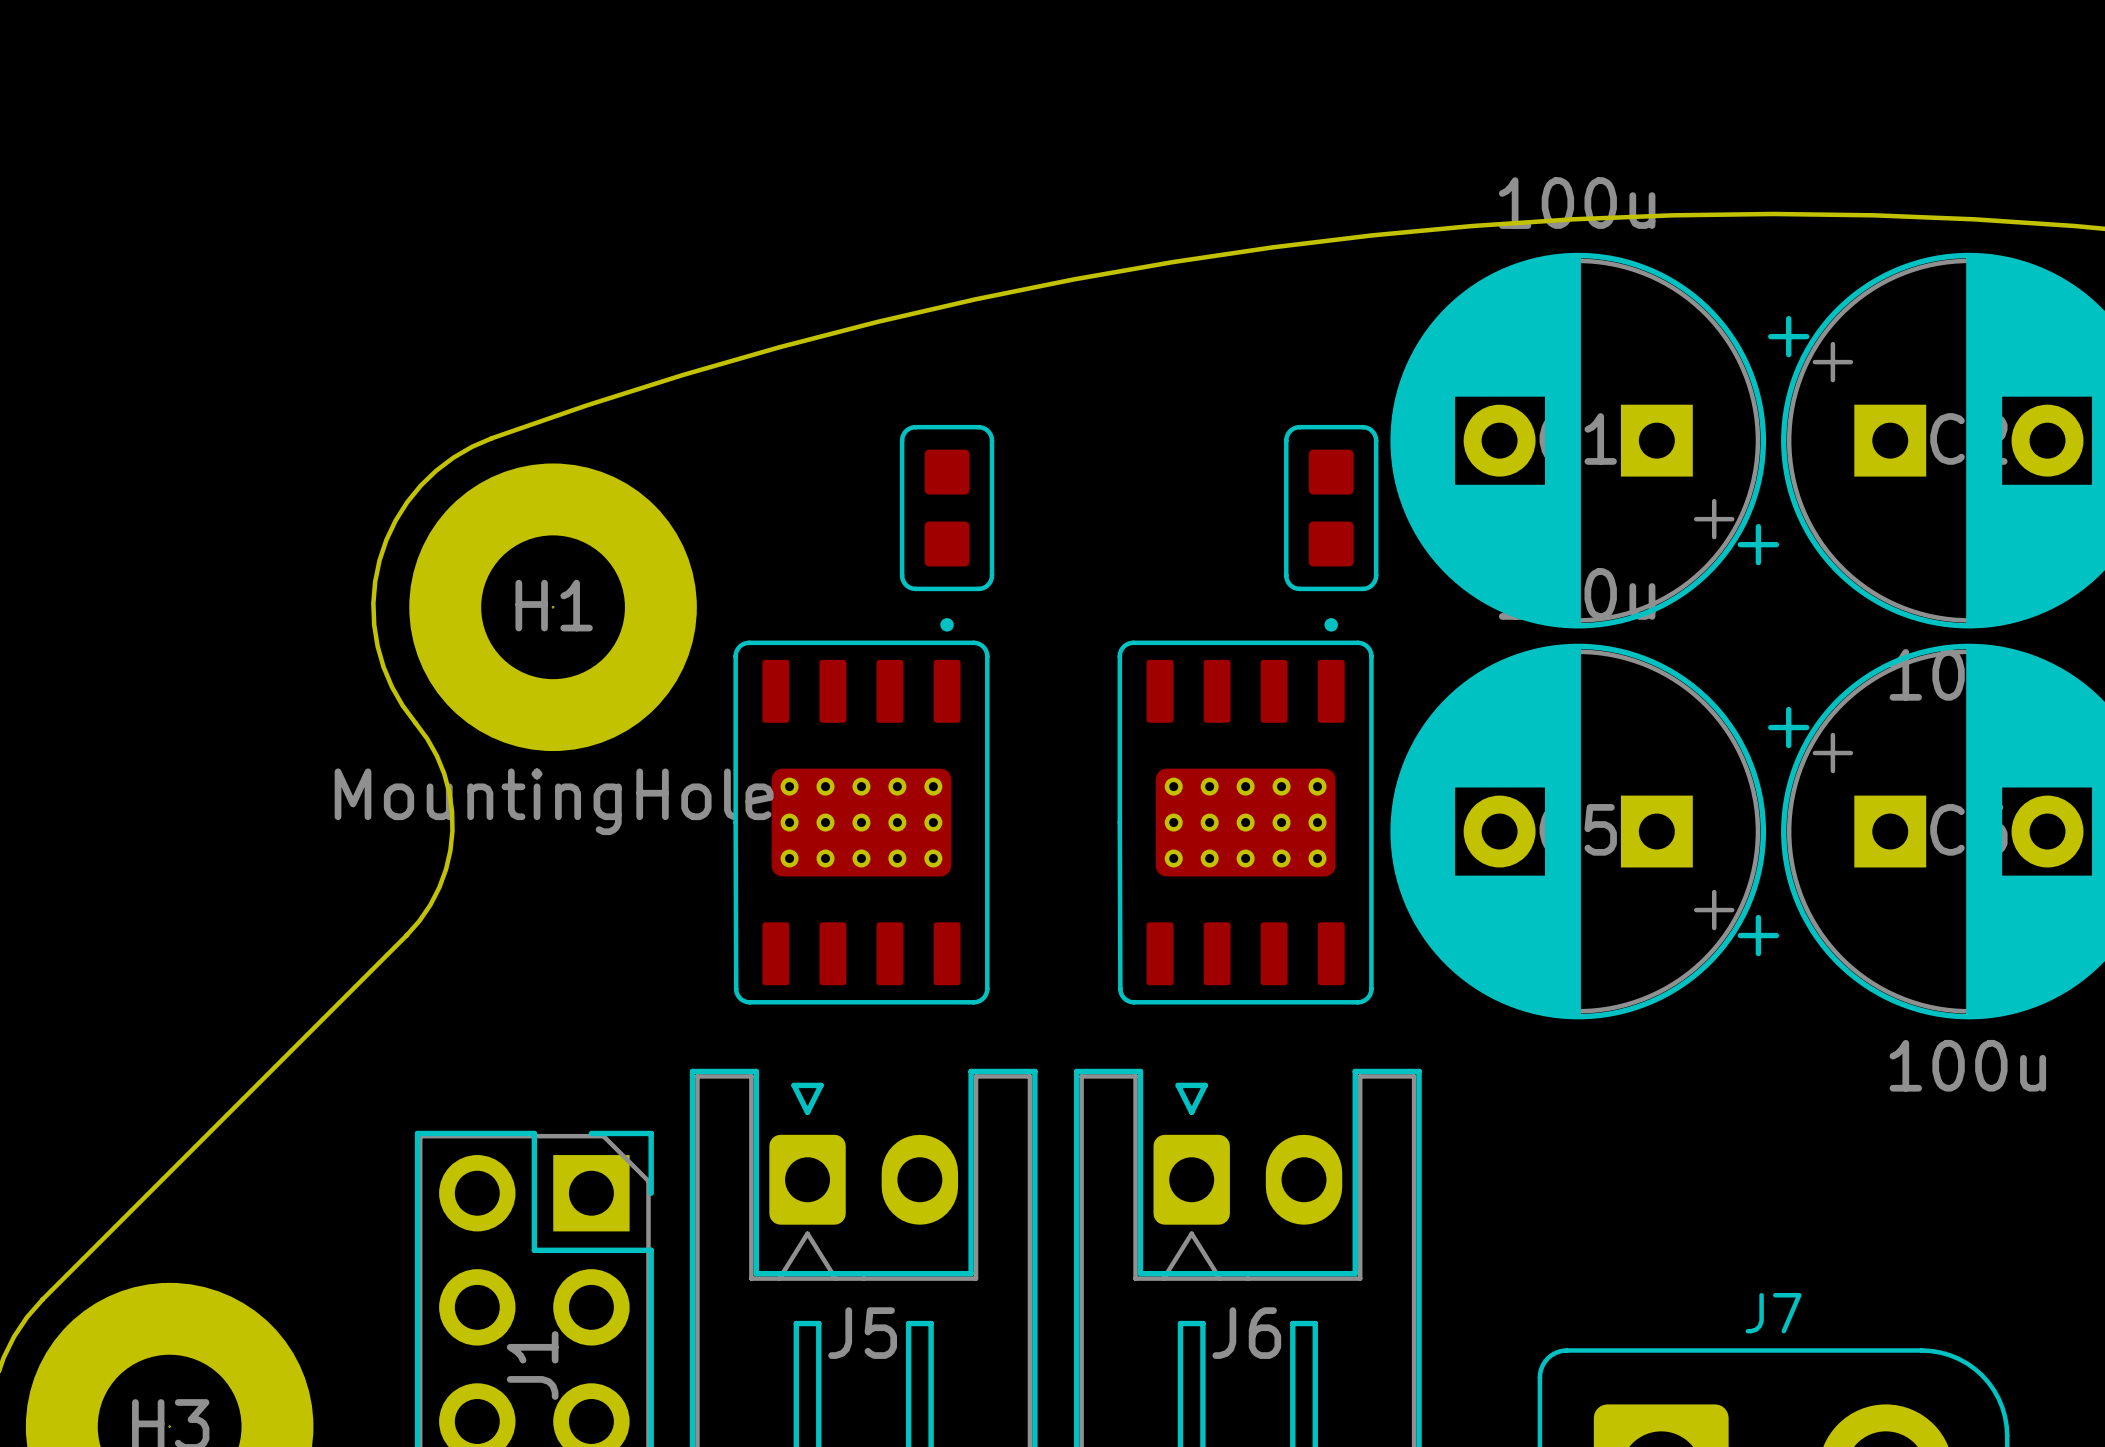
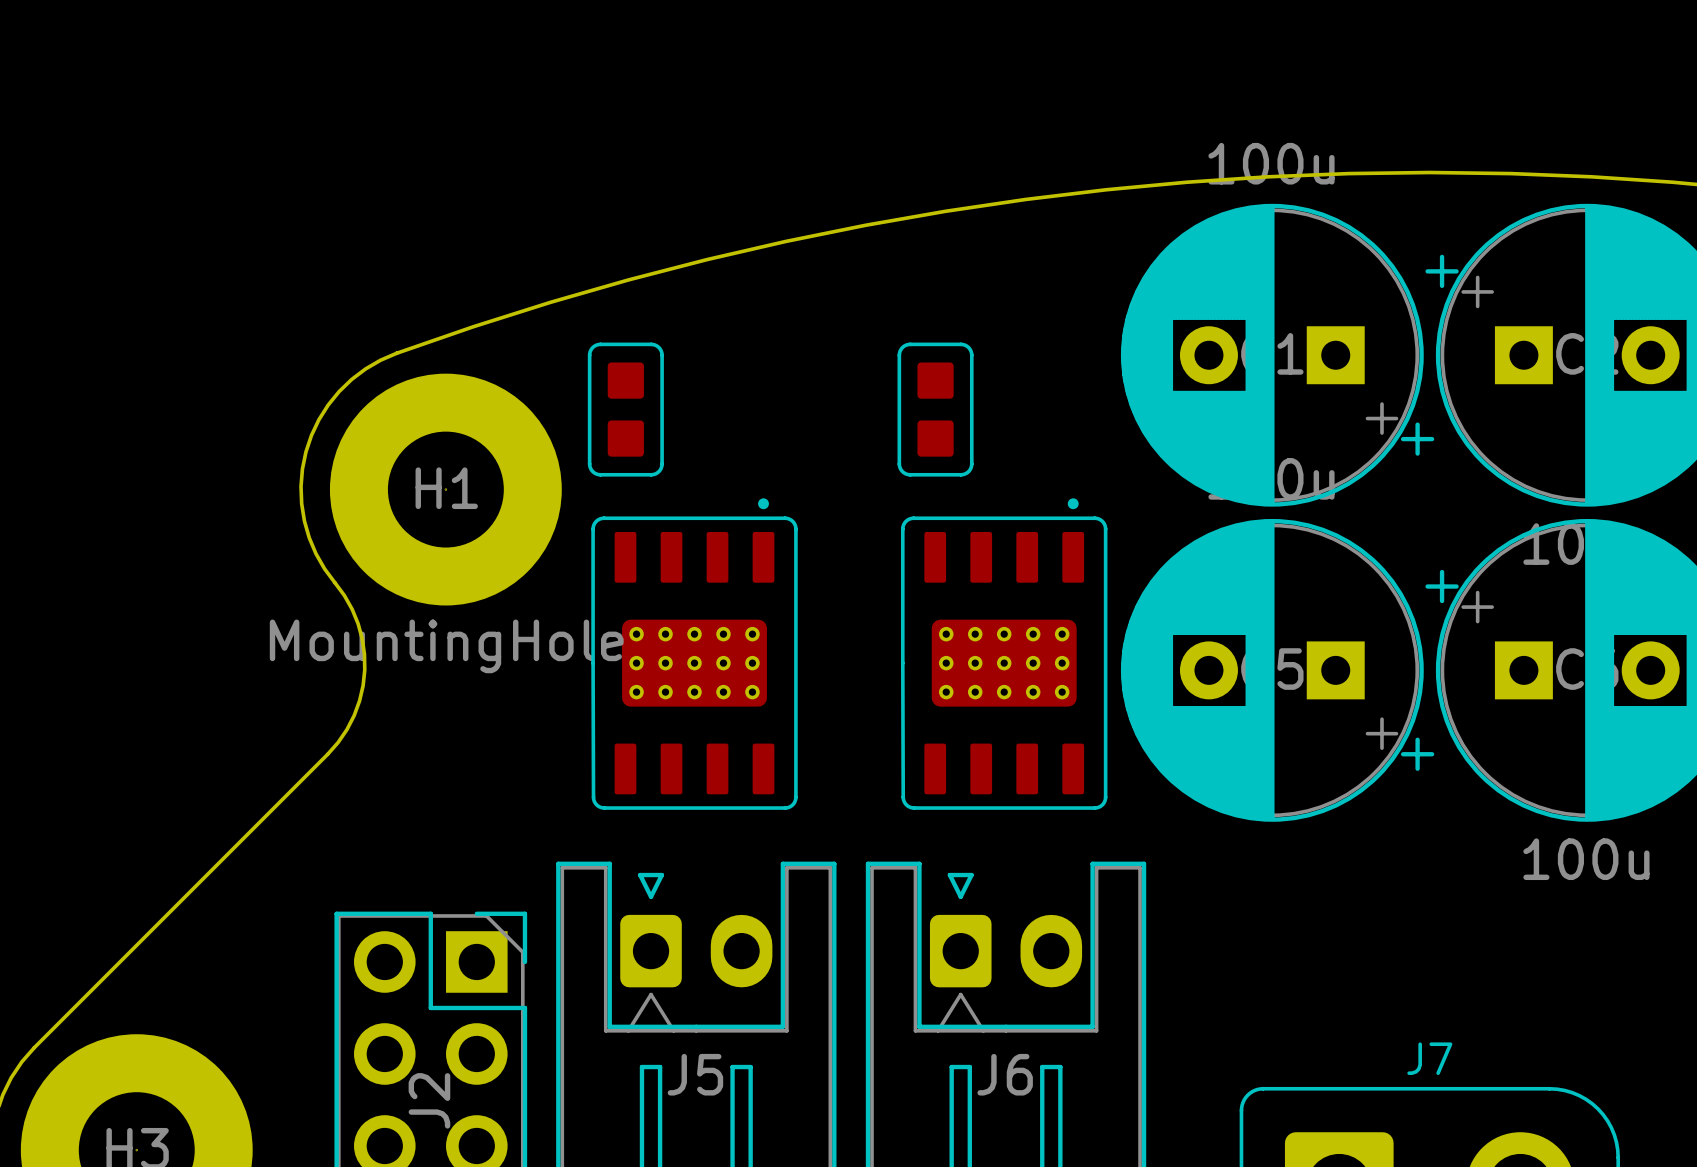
part: none -> (625, 409)
part: (947, 508) -> none
part: none -> (935, 409)
part: (1331, 508) -> none
J1 name: J1 (532, 1365) -> J2 (429, 1100)

